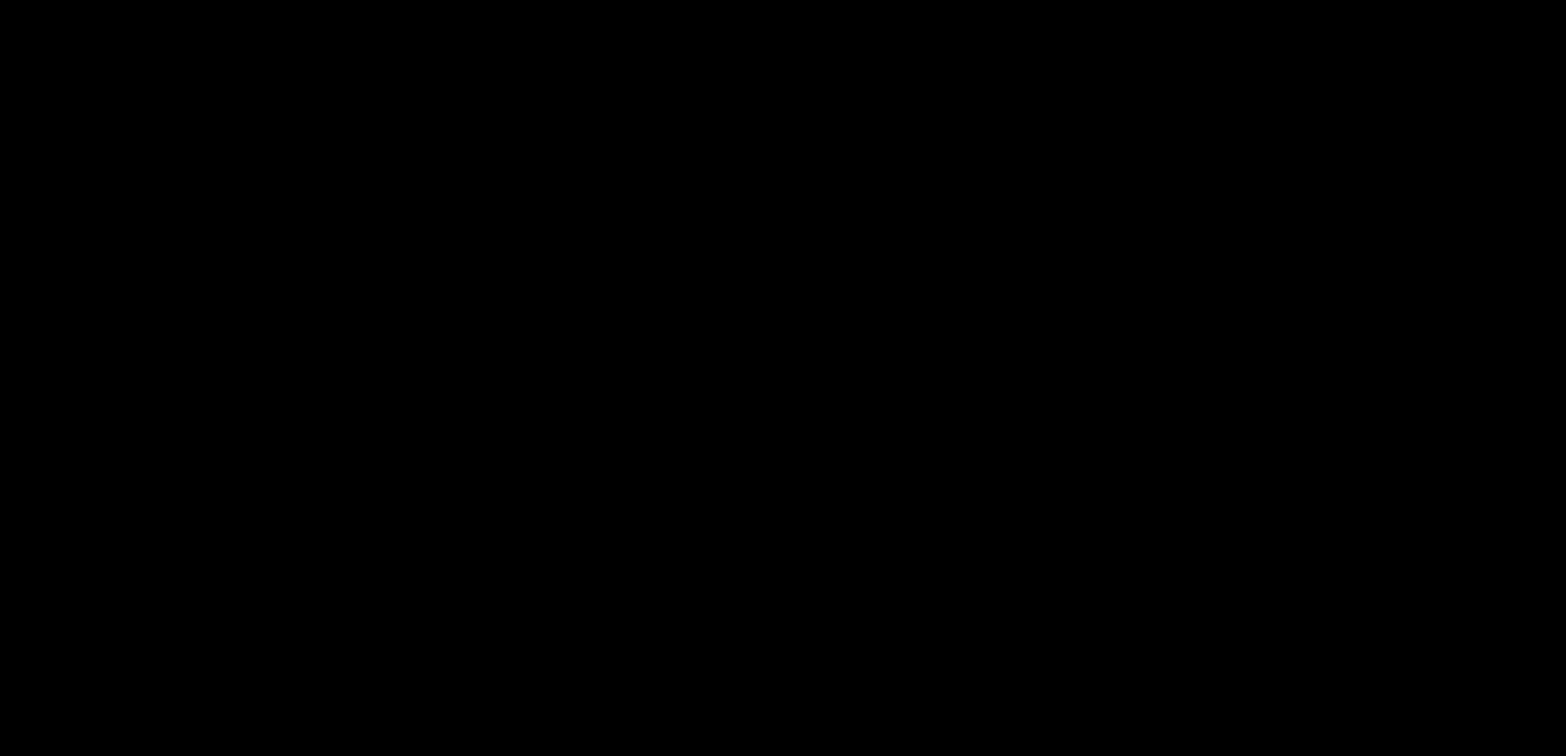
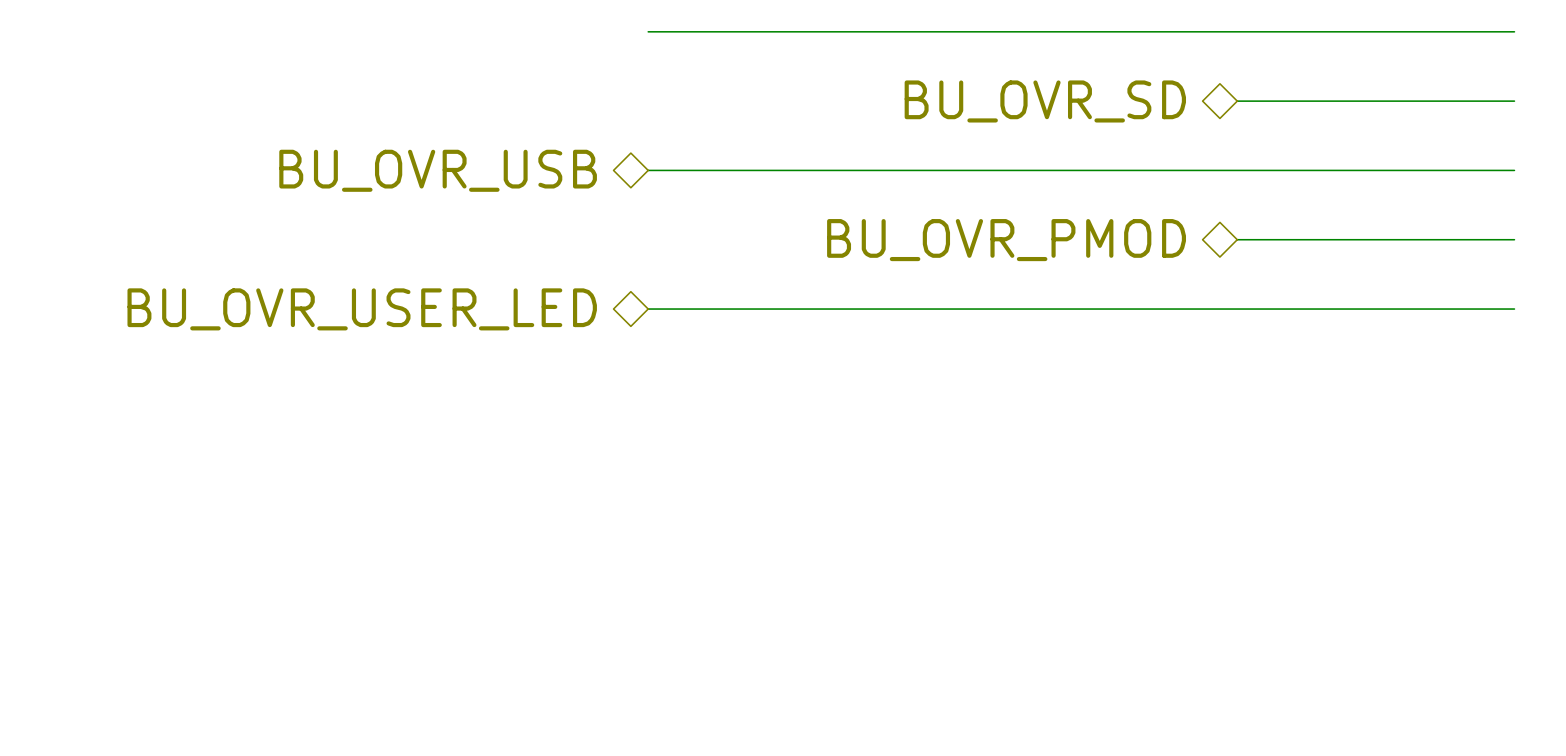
wire: none -> (648, 31) (1514, 31)
wire: none -> (1237, 101) (1514, 101)
hierarchical label: none -> BU_OVR_SD (1045, 101)
wire: none -> (648, 170) (1514, 170)
hierarchical label: none -> BU_OVR_USB (438, 170)
wire: none -> (1237, 239) (1514, 239)
hierarchical label: none -> BU_OVR_PMOD (1006, 240)
wire: none -> (648, 309) (1514, 309)
hierarchical label: none -> BU_OVR_USER_LED (362, 309)

